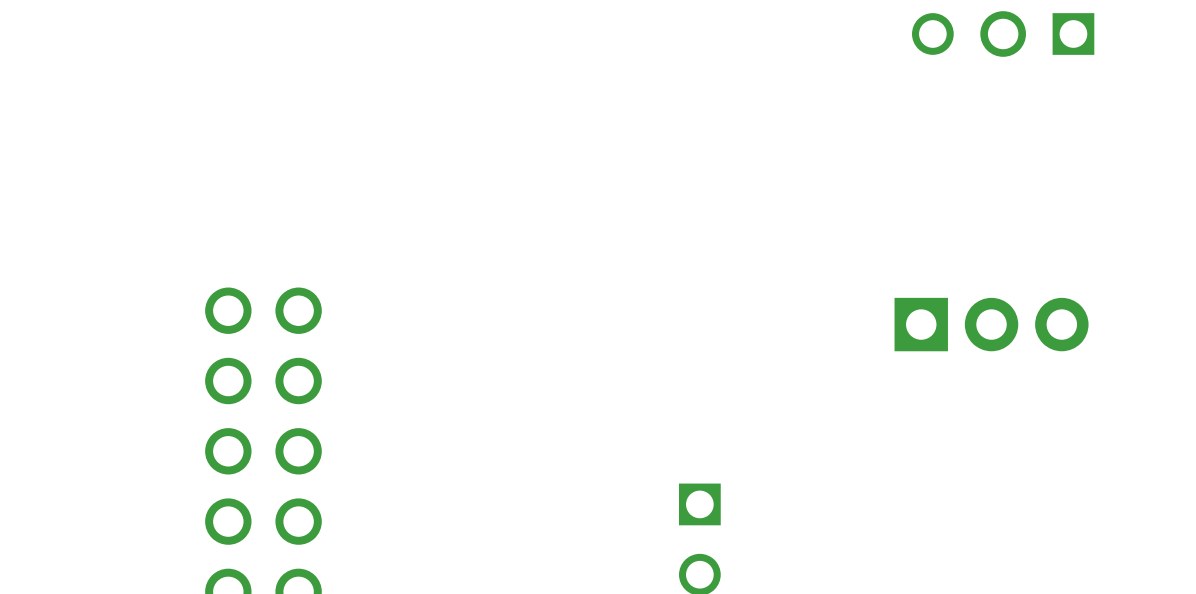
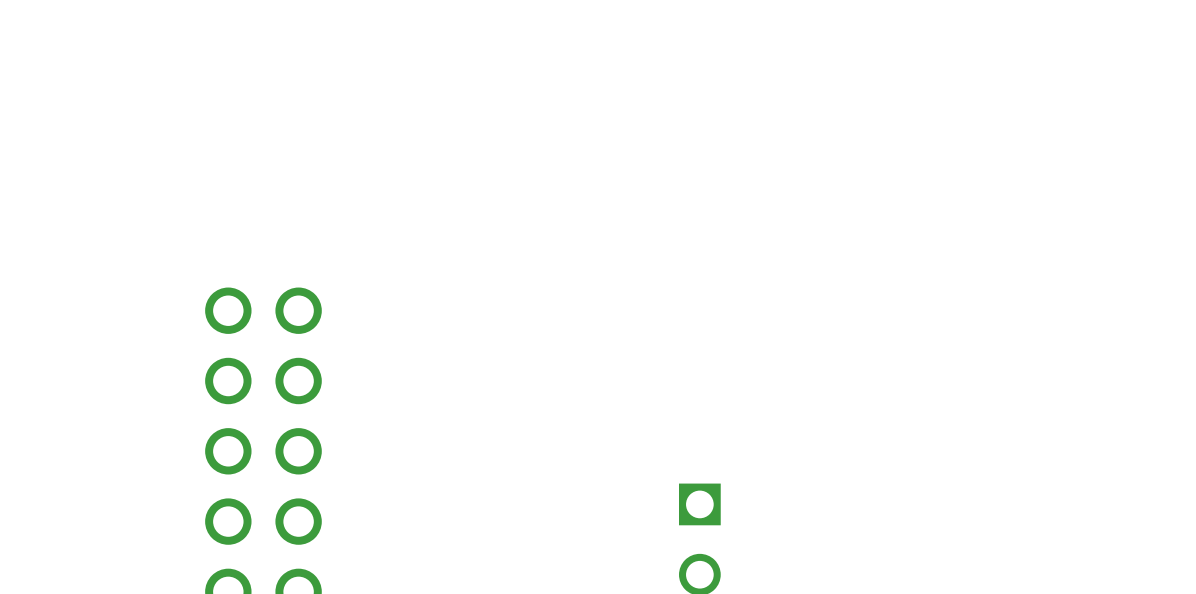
part: (1003, 33) -> none
part: (991, 324) -> none

